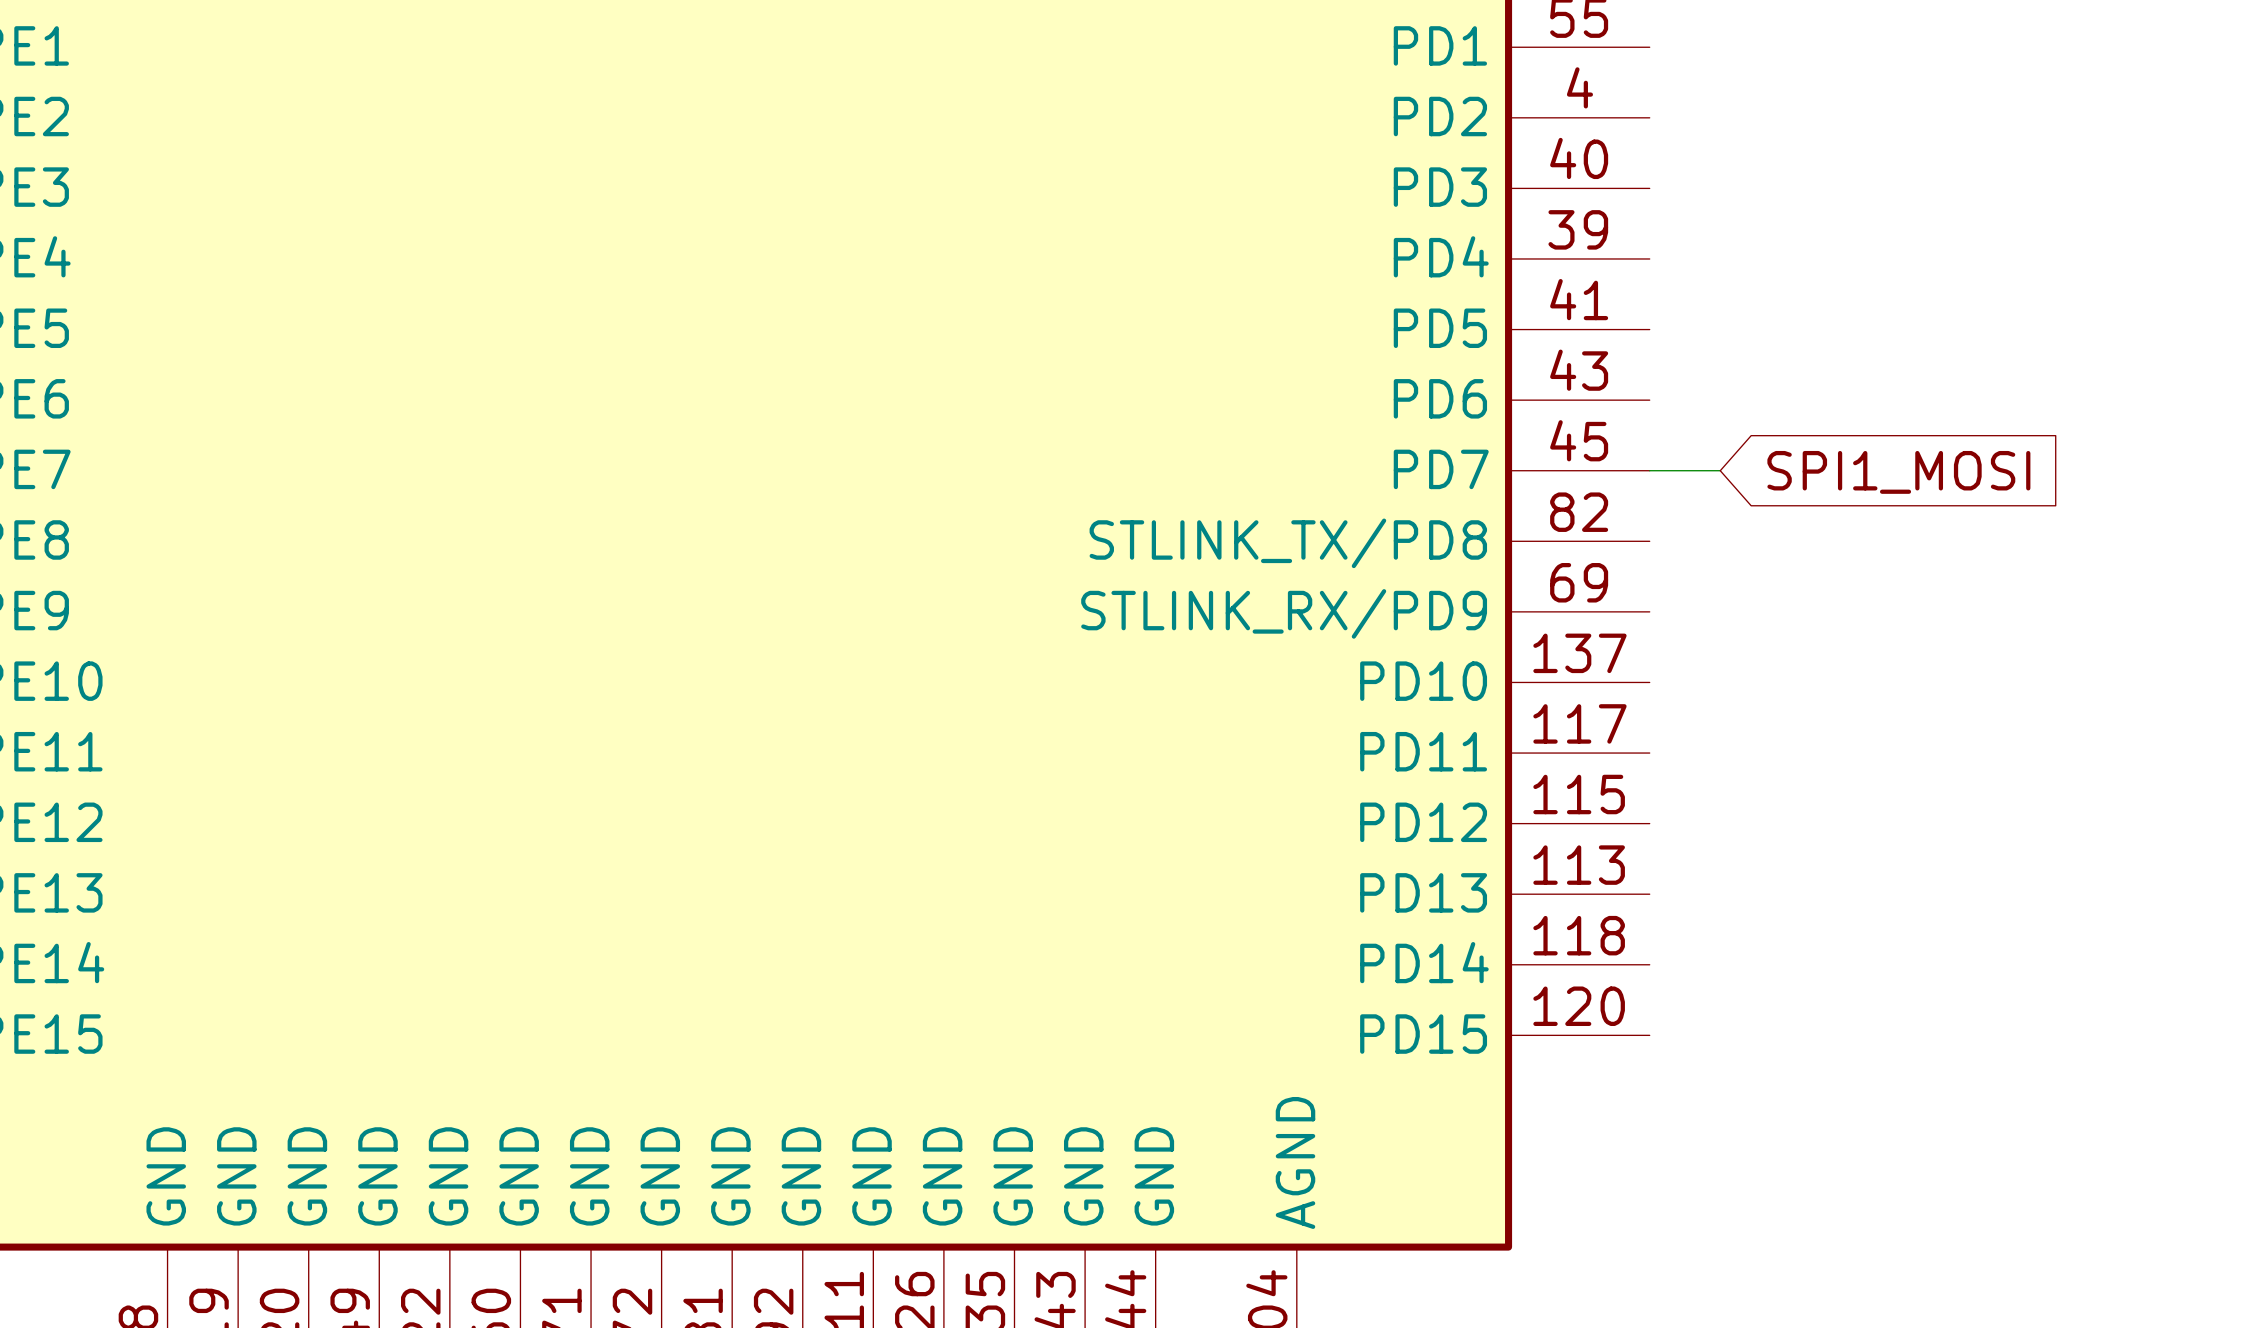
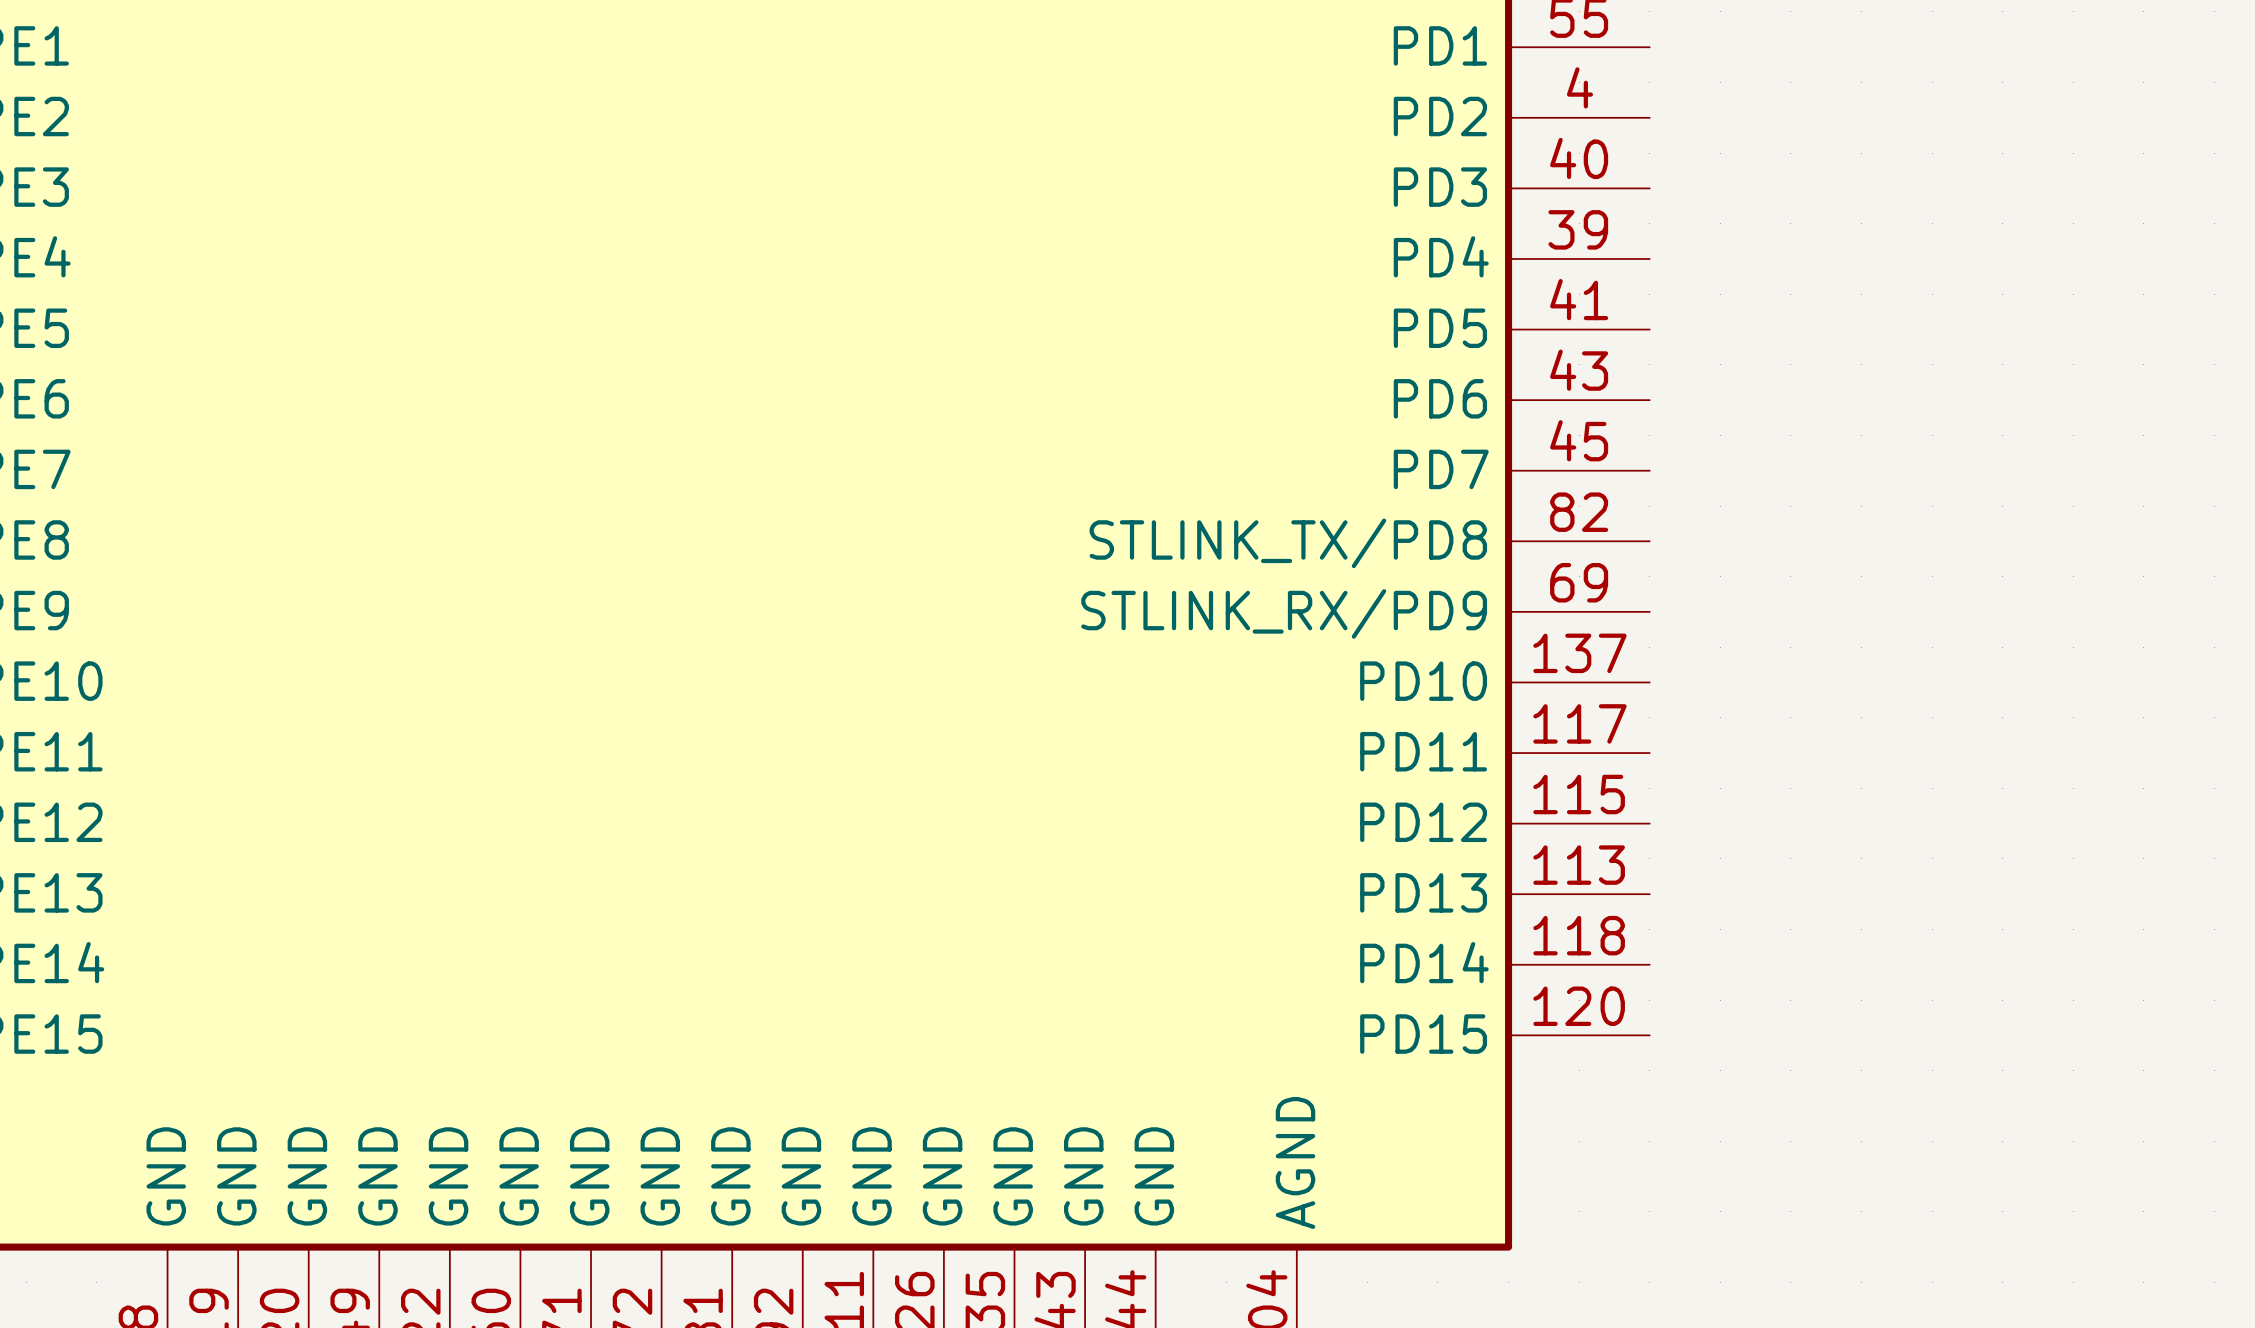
wire: (1649, 470) (1720, 470) -> none
global label: SPI1_MOSI (1898, 472) -> none

